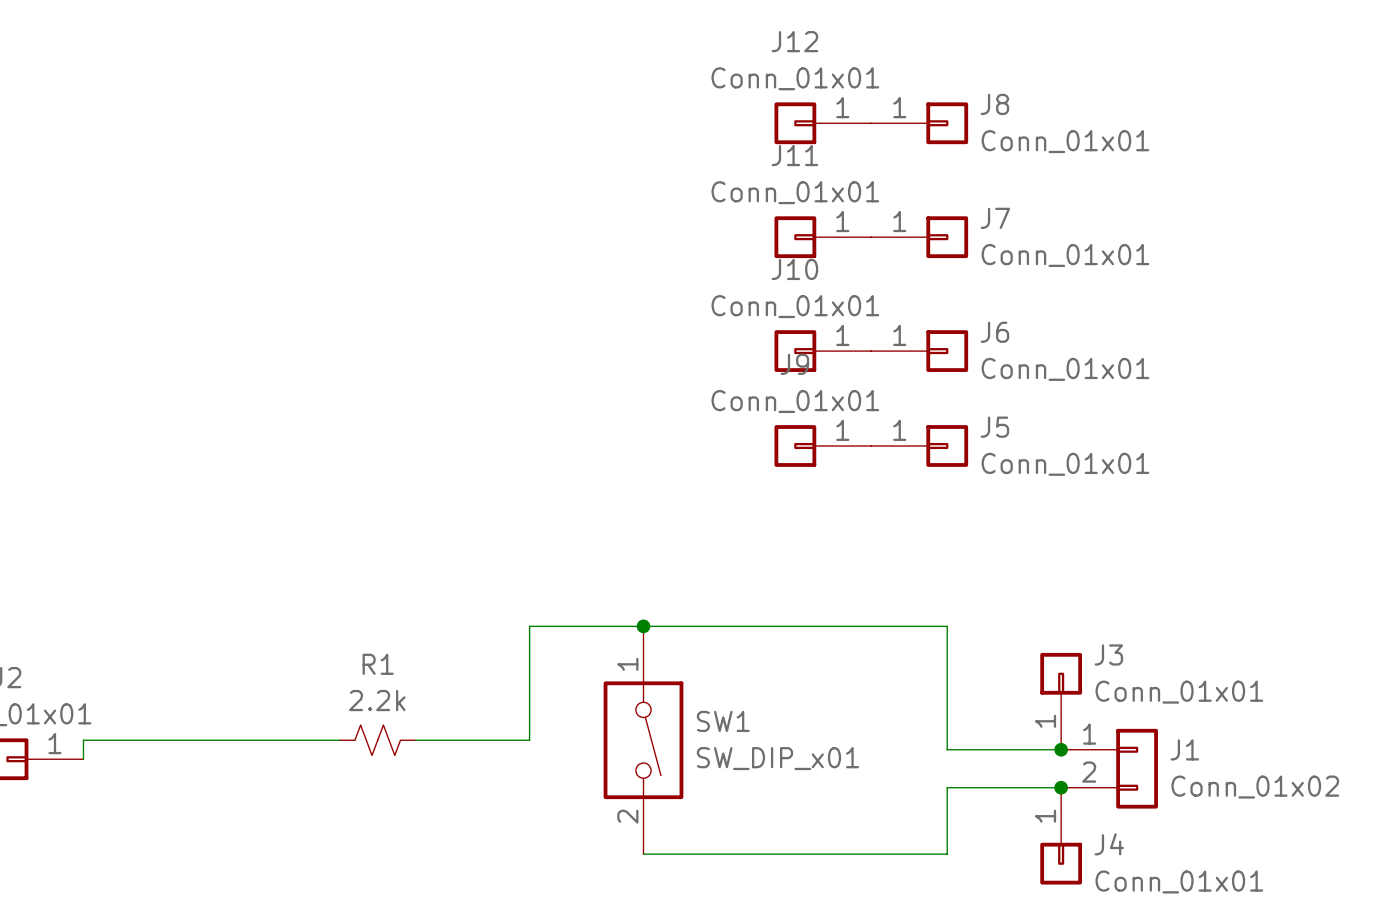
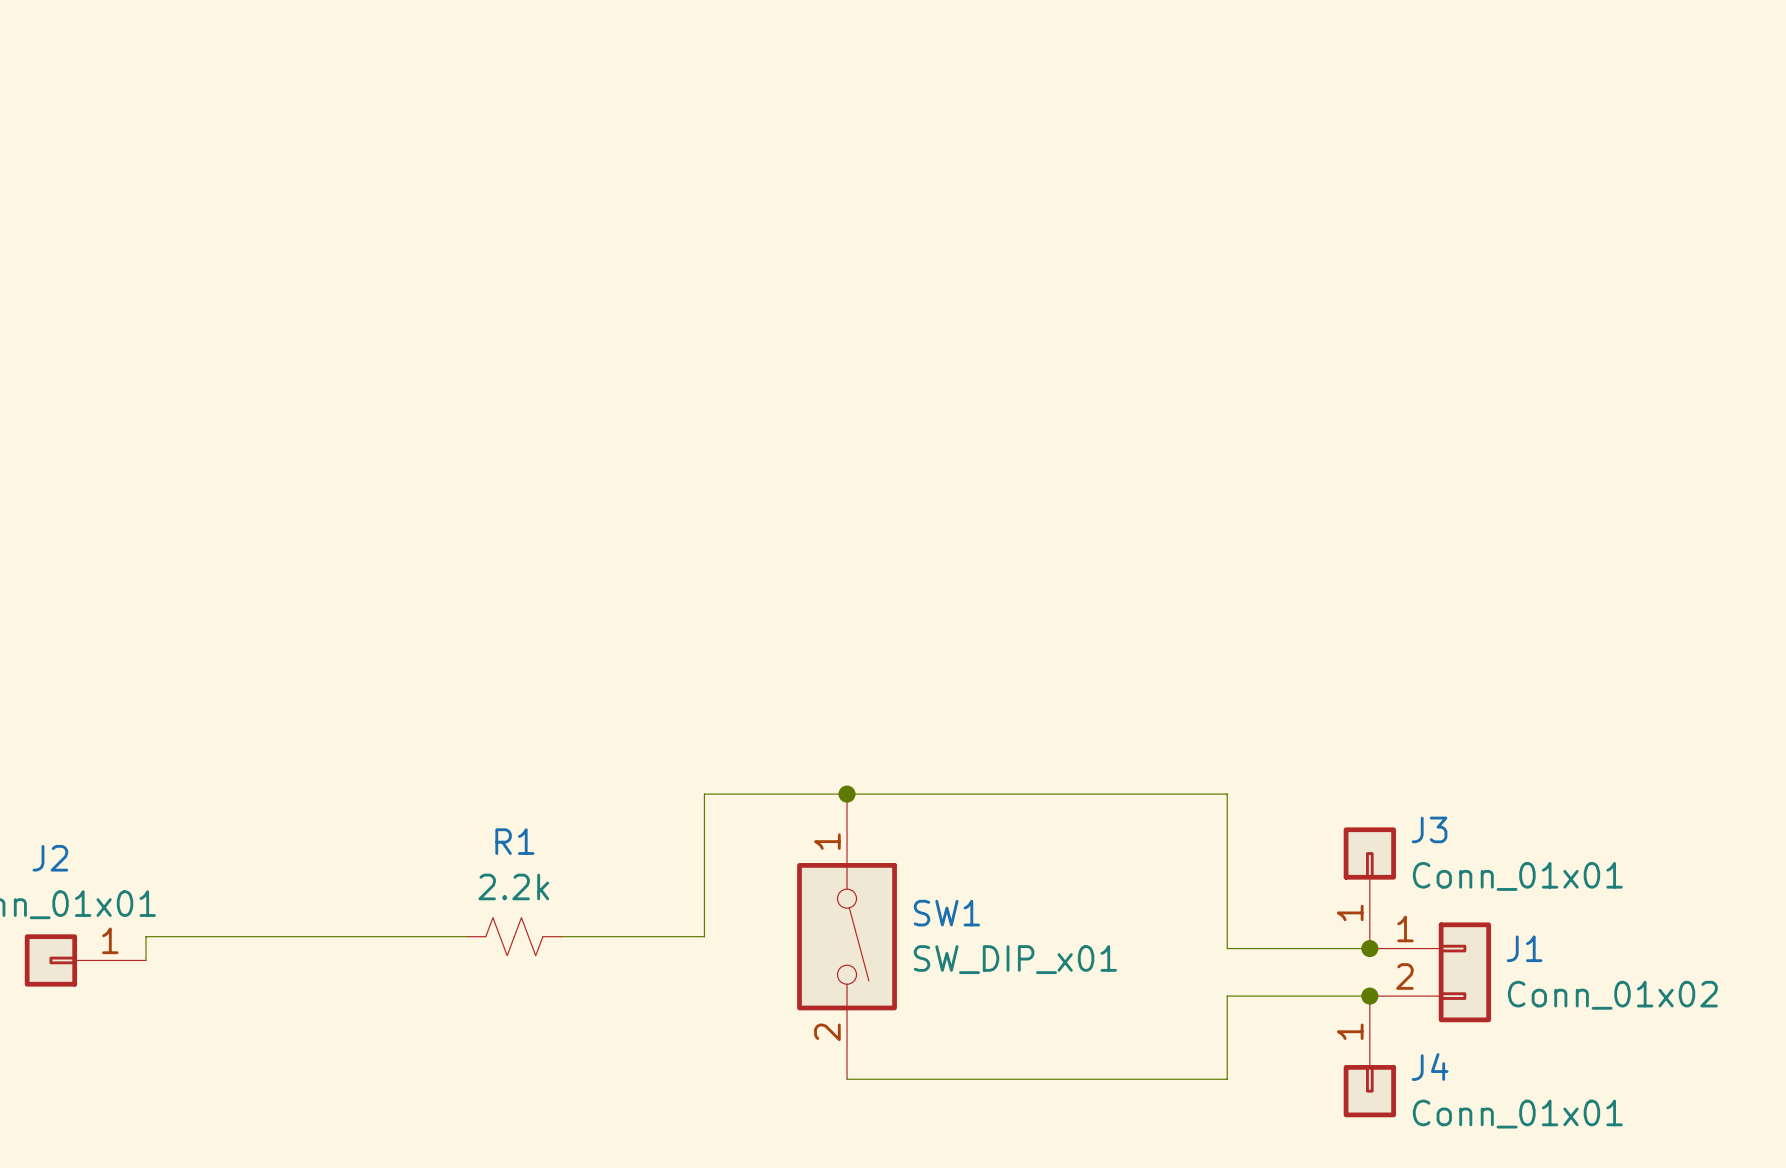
J12: Conn_01x01 (822, 123) -> none
J8: Conn_01x01 (919, 123) -> none
J11: Conn_01x01 (822, 237) -> none
J7: Conn_01x01 (919, 237) -> none
J10: Conn_01x01 (822, 351) -> none
J6: Conn_01x01 (919, 351) -> none
J9: Conn_01x01 (822, 446) -> none
J5: Conn_01x01 (919, 446) -> none

